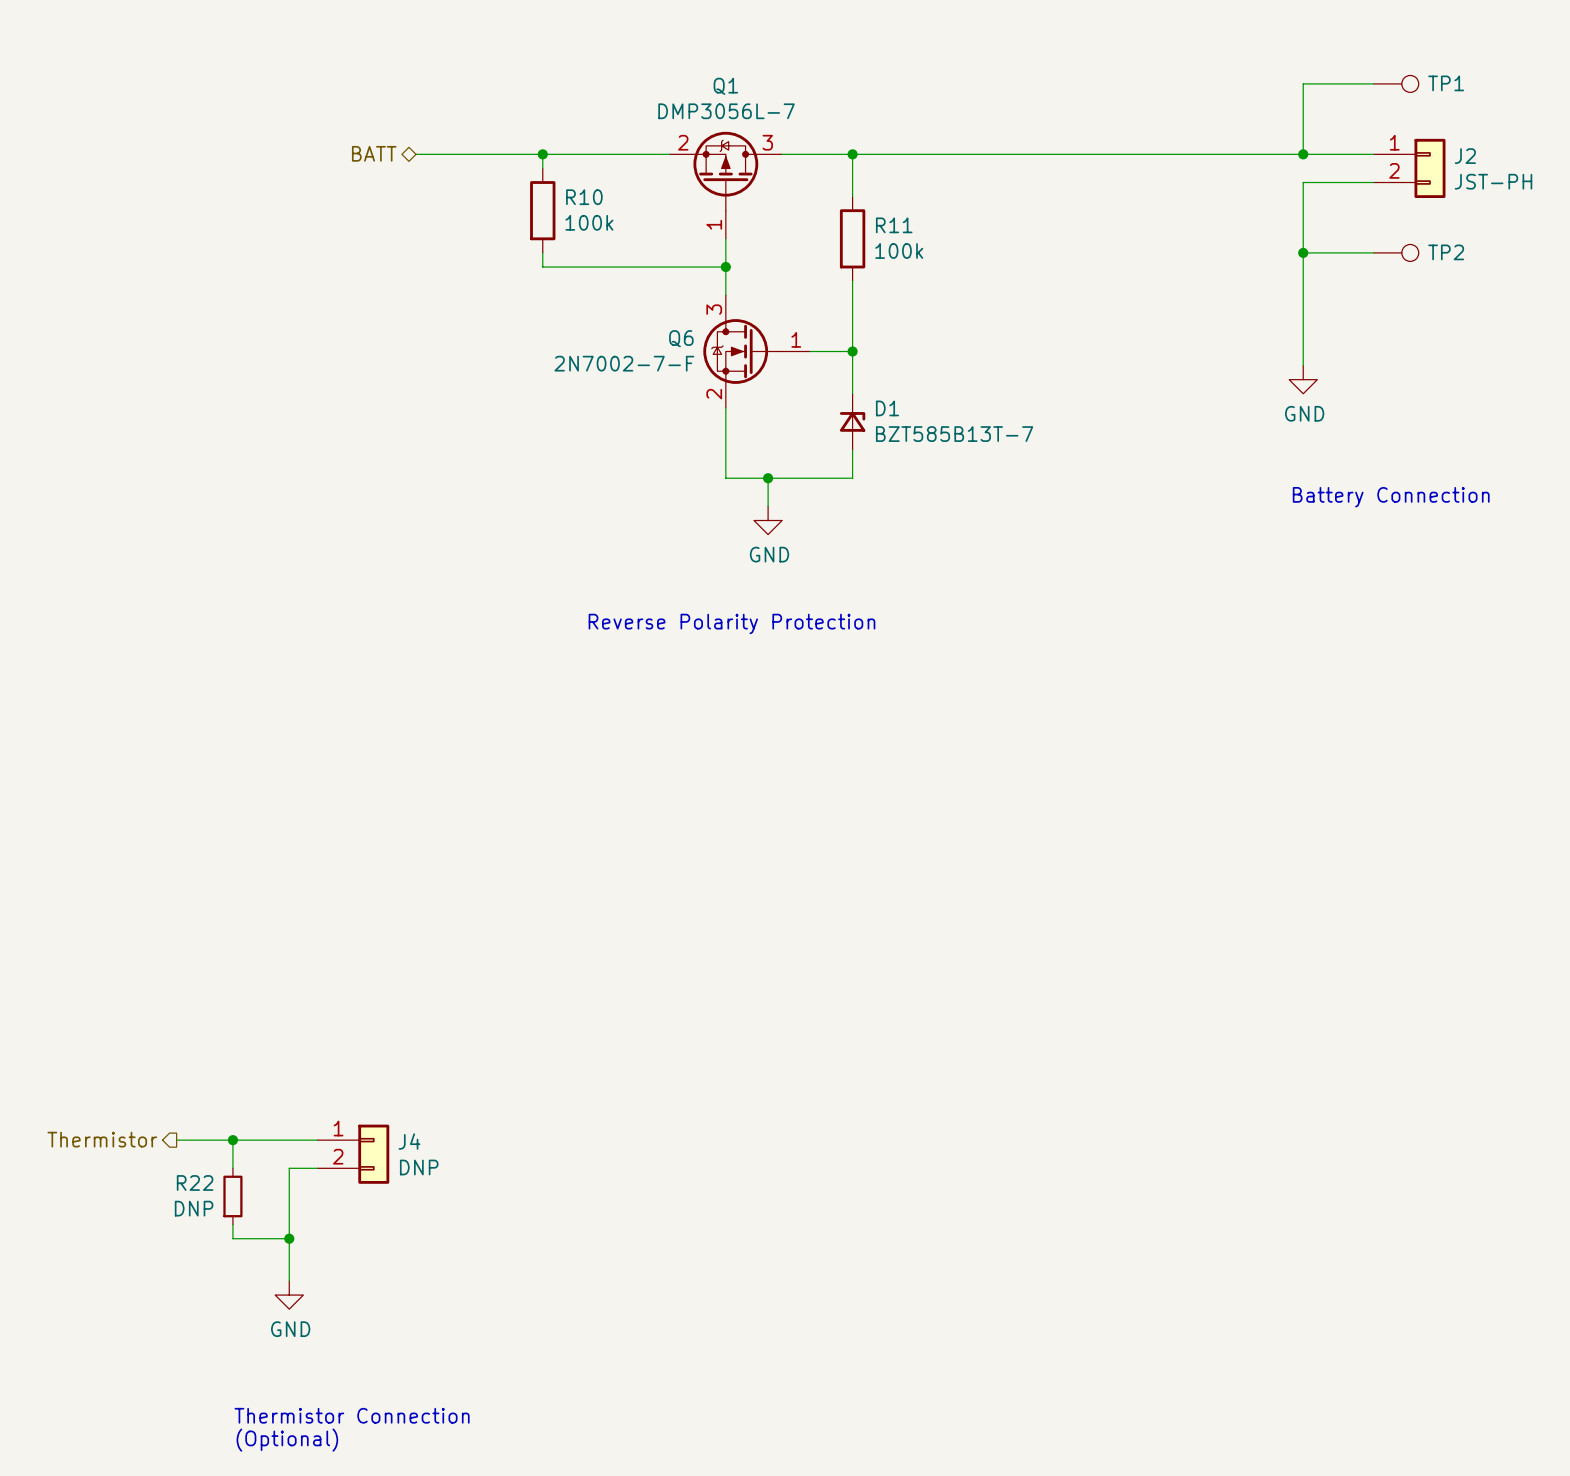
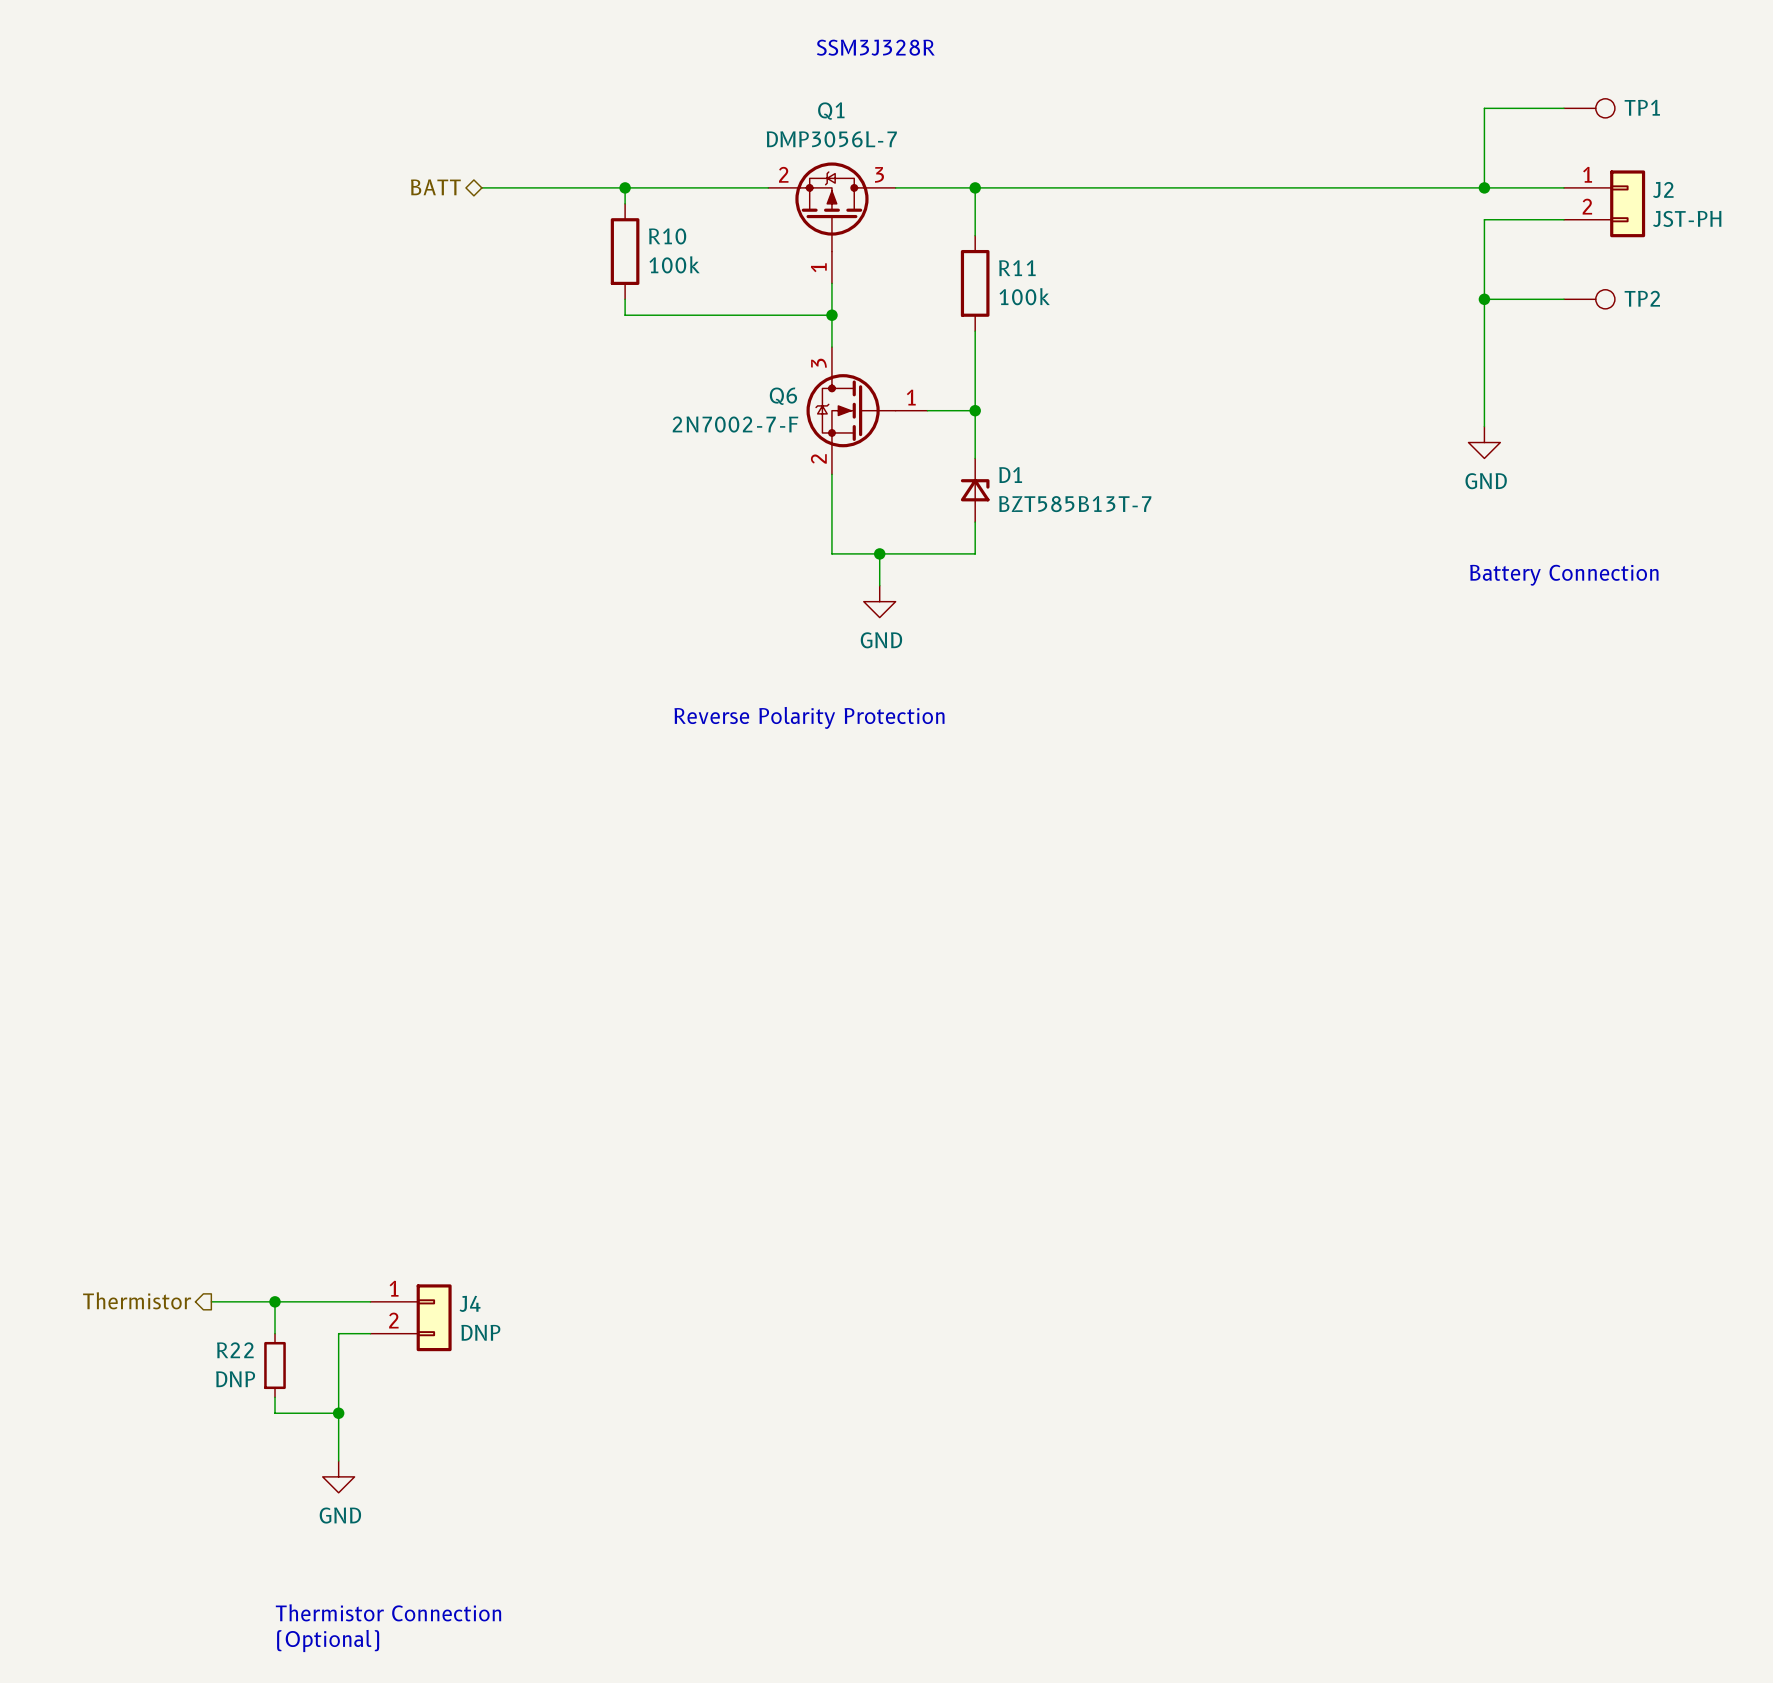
text: none -> SSM3J328R (875, 47)

